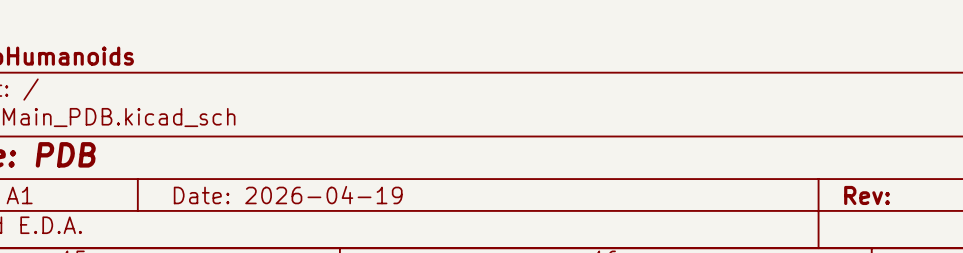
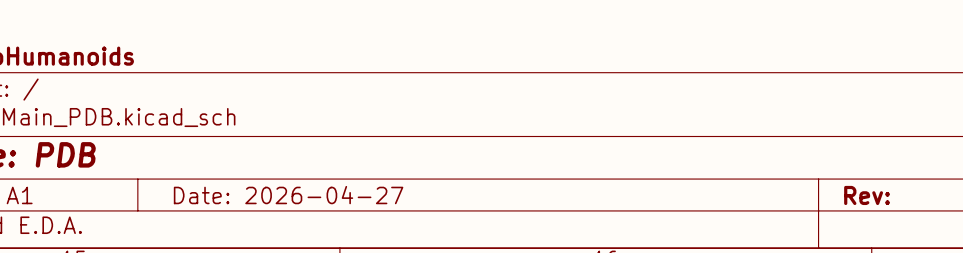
title block: Date: 2026-04-19 (288, 195) -> Date: 2026-04-27 (288, 195)

